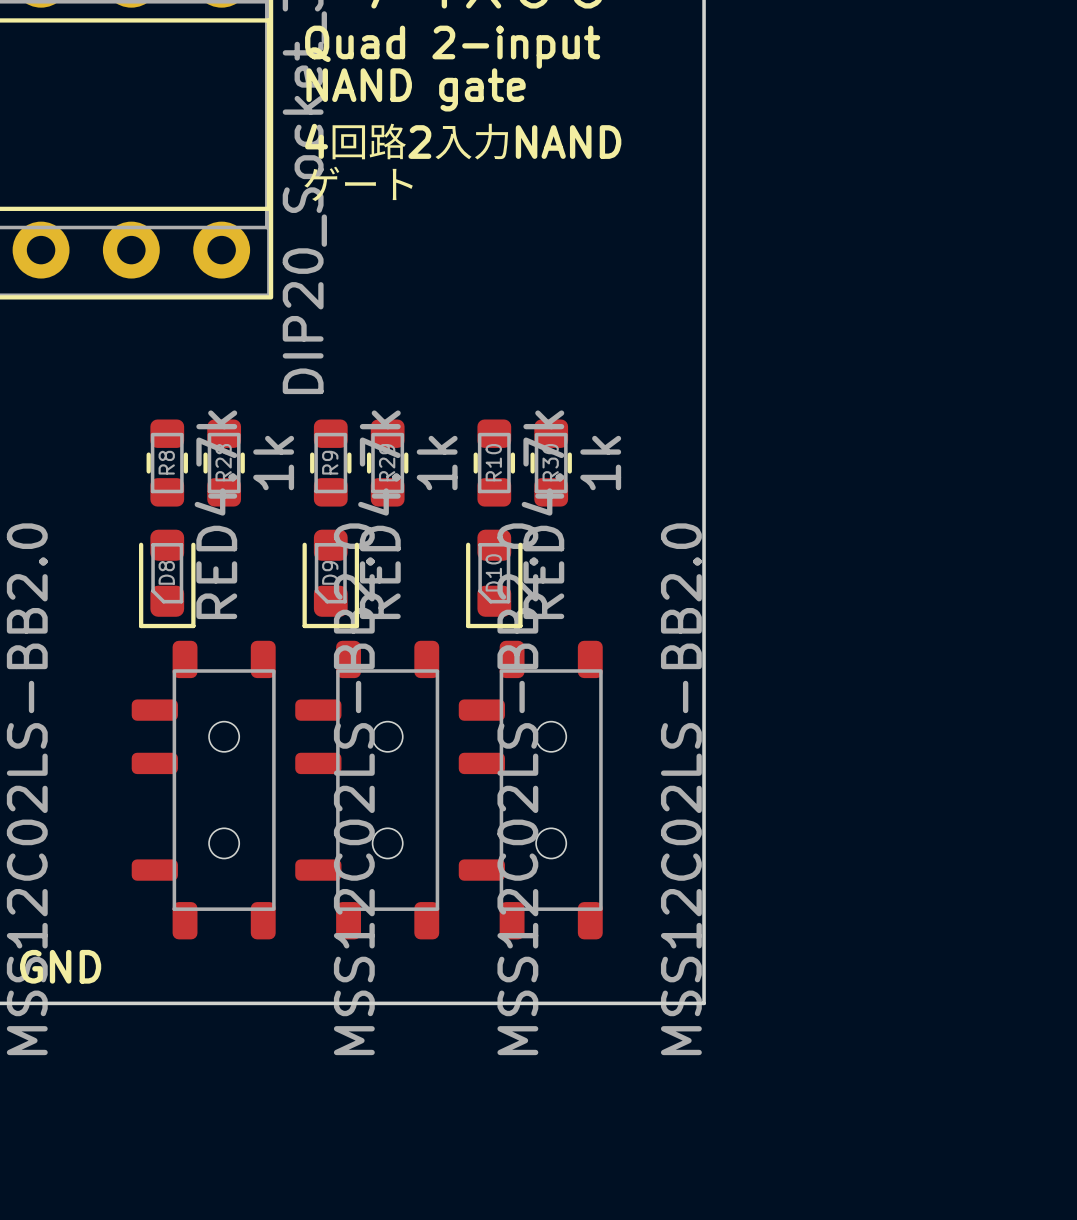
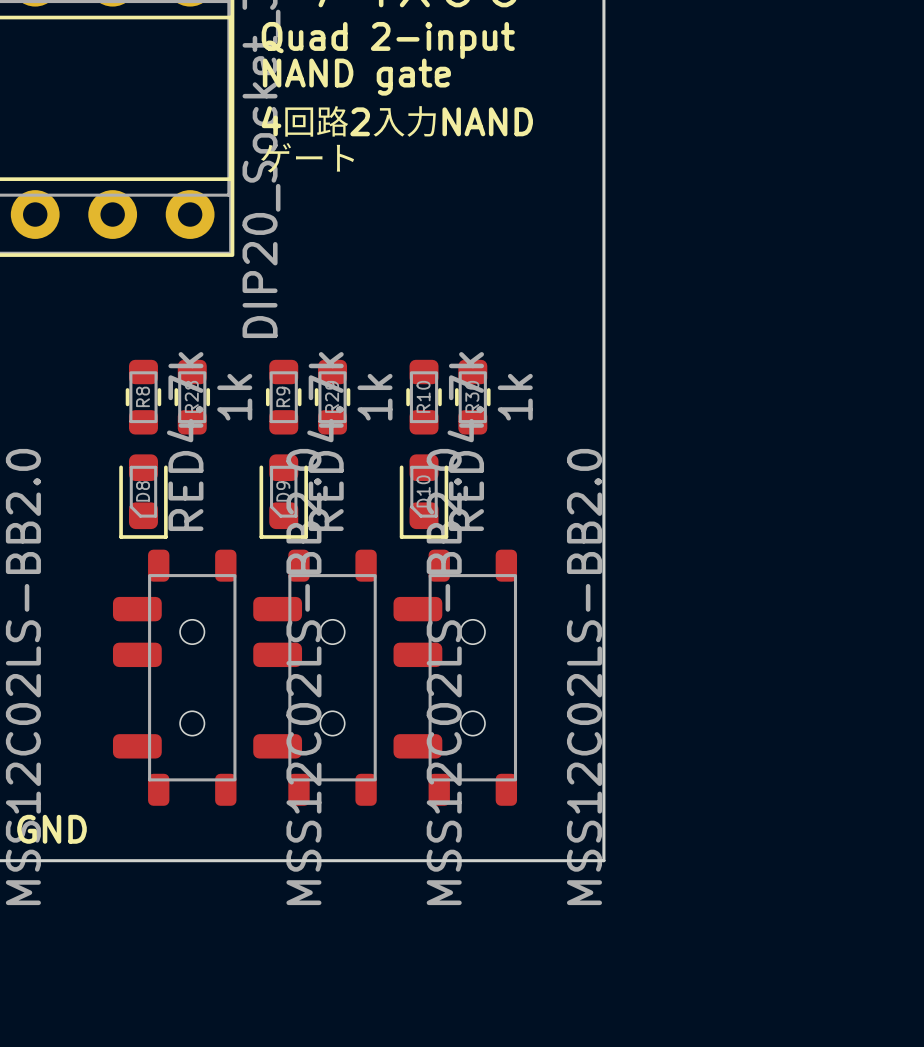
part footprint: [131, 640, 276, 940] -> [112, 549, 237, 806]
part footprint: [295, 640, 440, 940] -> [253, 549, 377, 806]
part footprint: [458, 640, 603, 940] -> [393, 549, 518, 806]

